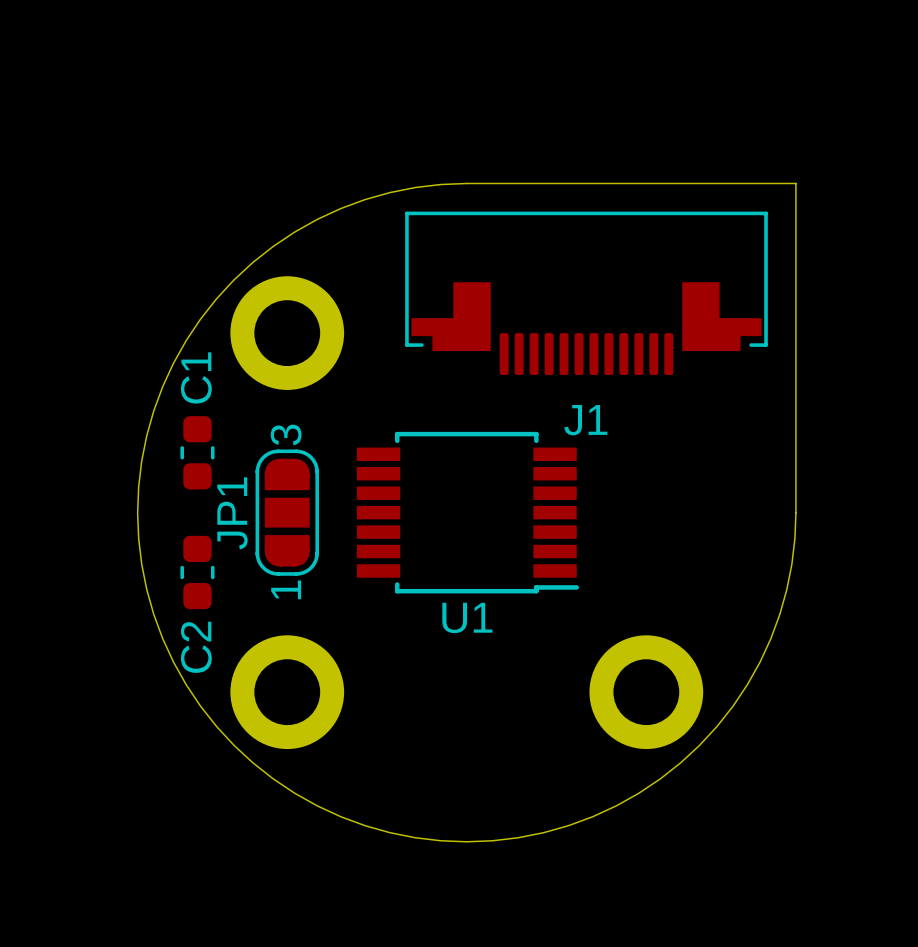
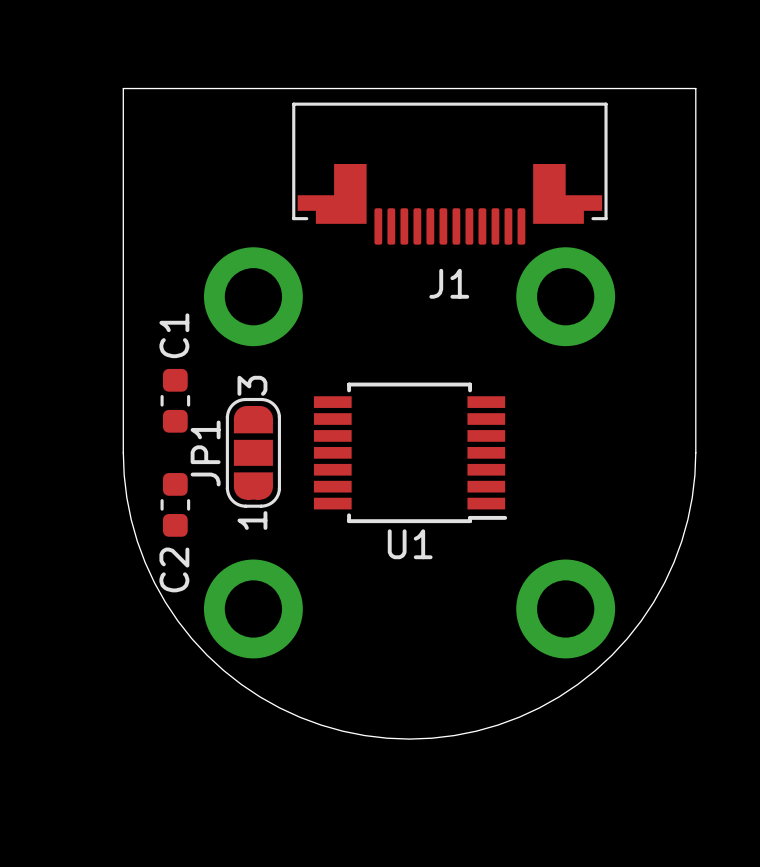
board edge: (795, 183) (440, 184) (389, 192) (340, 208) (317, 219) (273, 246) (234, 279) (216, 298) (186, 340) (162, 386) (146, 435) (141, 461) (137, 512) (141, 564) (146, 589) (162, 638) (186, 684) (216, 726) (234, 745) (253, 762) (294, 793) (340, 816) (389, 832) (415, 837) (466, 841) (518, 837) (543, 832) (592, 816) (638, 793) (680, 762) (699, 745) (717, 726) (747, 684) (770, 638) (786, 589) (791, 564) (795, 512) -> (695, 166) (695, 88) (123, 88) (123, 452) (126, 497) (131, 519) (145, 562) (165, 602) (177, 621) (207, 655) (223, 670) (259, 696) (300, 717) (342, 731) (364, 735) (409, 739) (454, 735) (476, 731) (519, 717) (559, 696) (595, 670) (611, 655) (627, 638) (653, 602) (674, 562) (687, 519) (692, 497) (695, 452)
J1 position: (586, 293) -> (449, 173)
part: none -> (565, 296)

